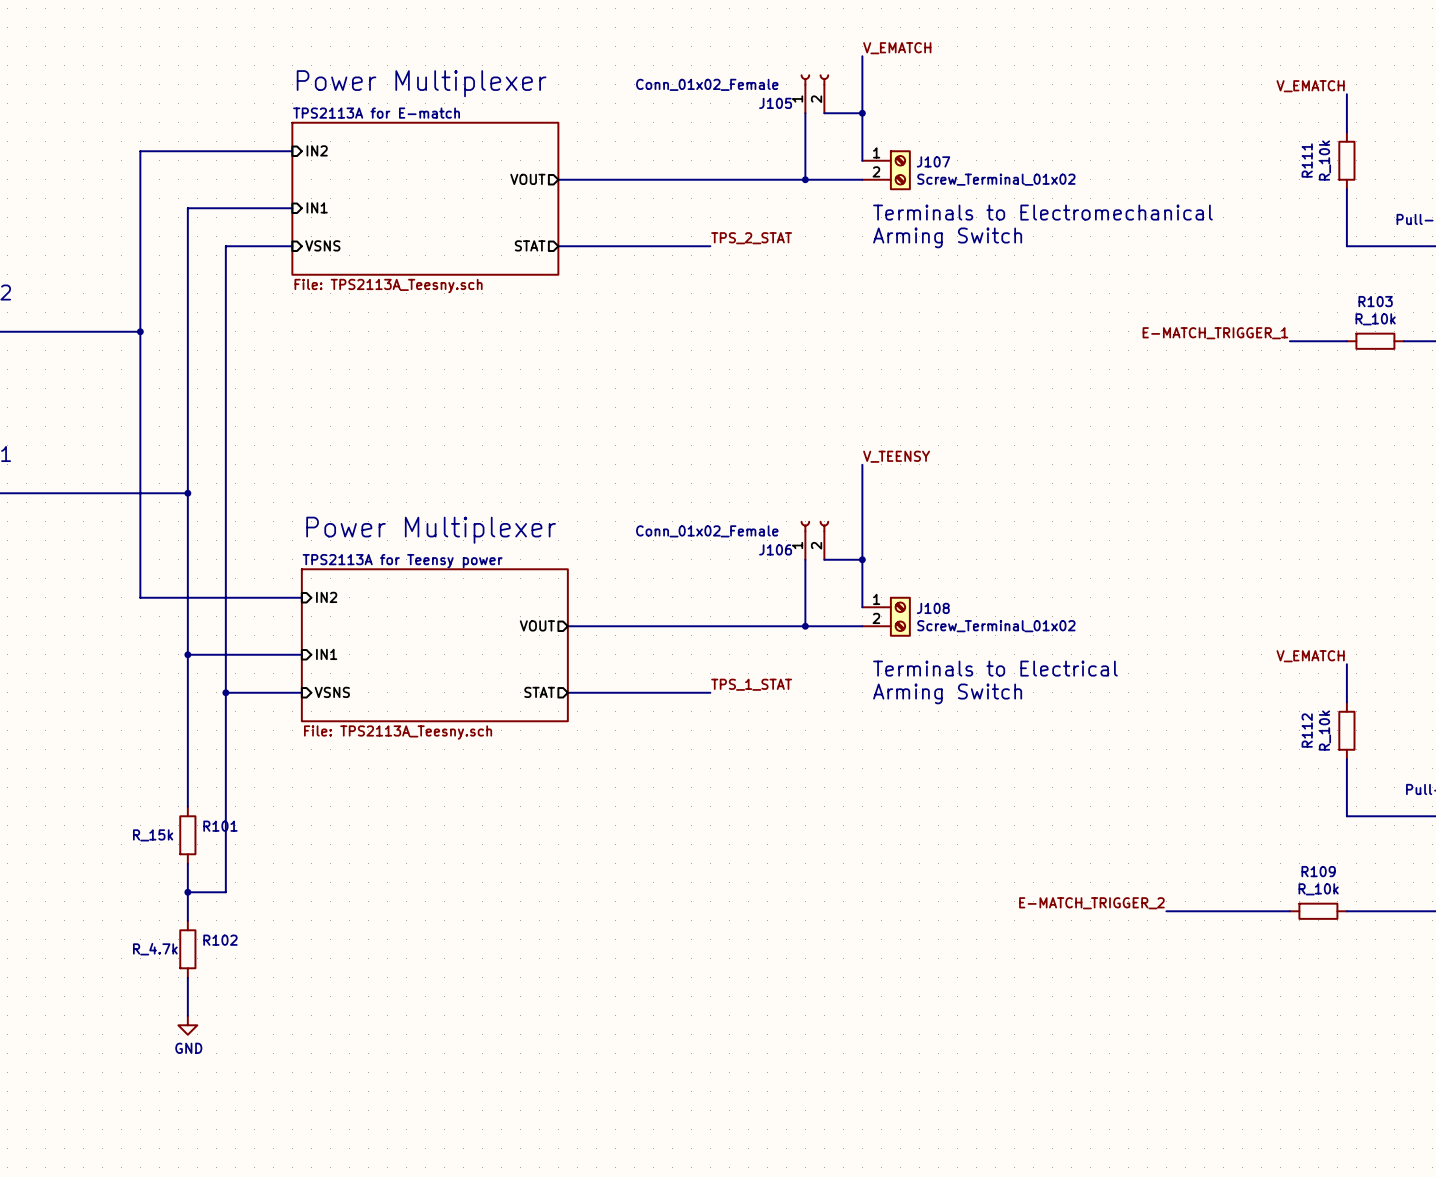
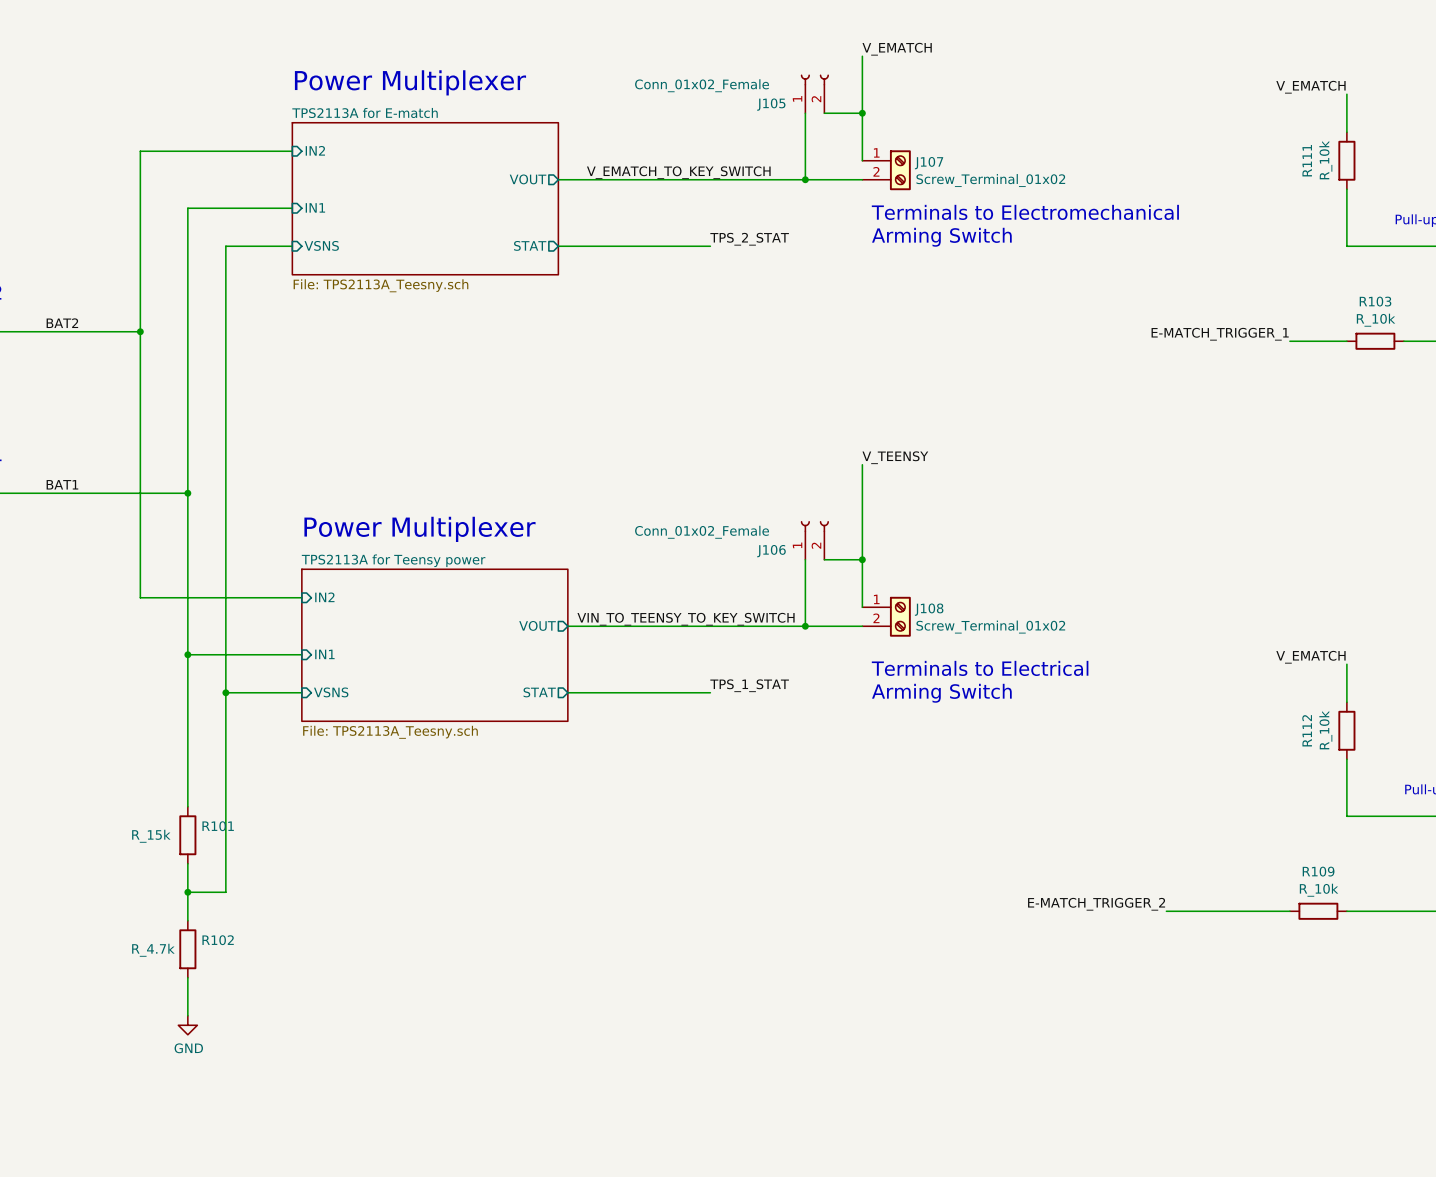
label: none -> V_EMATCH_TO_KEY_SWITCH (678, 172)
label: none -> BAT2 (62, 323)
label: none -> BAT1 (62, 484)
label: none -> VIN_TO_TEENSY_TO_KEY_SWITCH (686, 619)

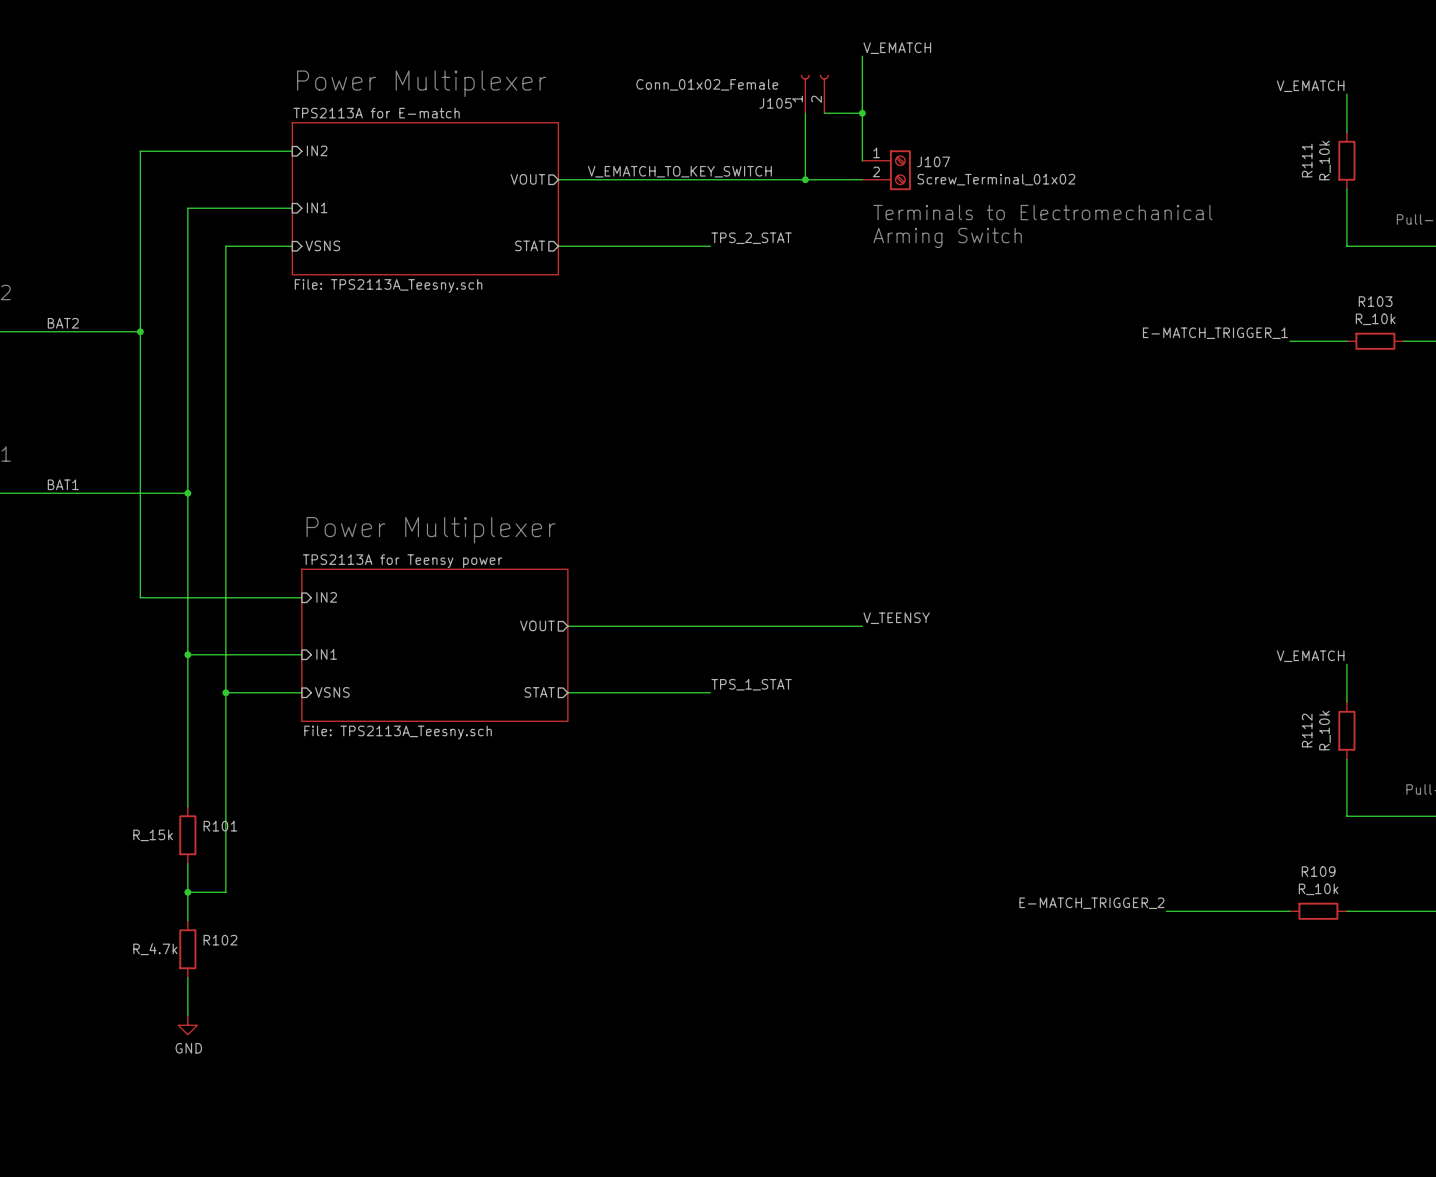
label position: V_TEENSY (895, 457) -> V_TEENSY (896, 618)
wire: (862, 464) (862, 607) -> none
J106: Conn_01x02_Female (814, 540) -> none
wire: (805, 559) (805, 626) -> none
wire: (824, 559) (862, 559) -> none
junction: (862, 559) -> none
J108: Screw_Terminal_01x02 (886, 616) -> none
label: VIN_TO_TEENSY_TO_KEY_SWITCH (686, 619) -> none
junction: (805, 626) -> none
text: Terminals to Electrical (980, 668) -> none
text: Arming Switch (941, 693) -> none

